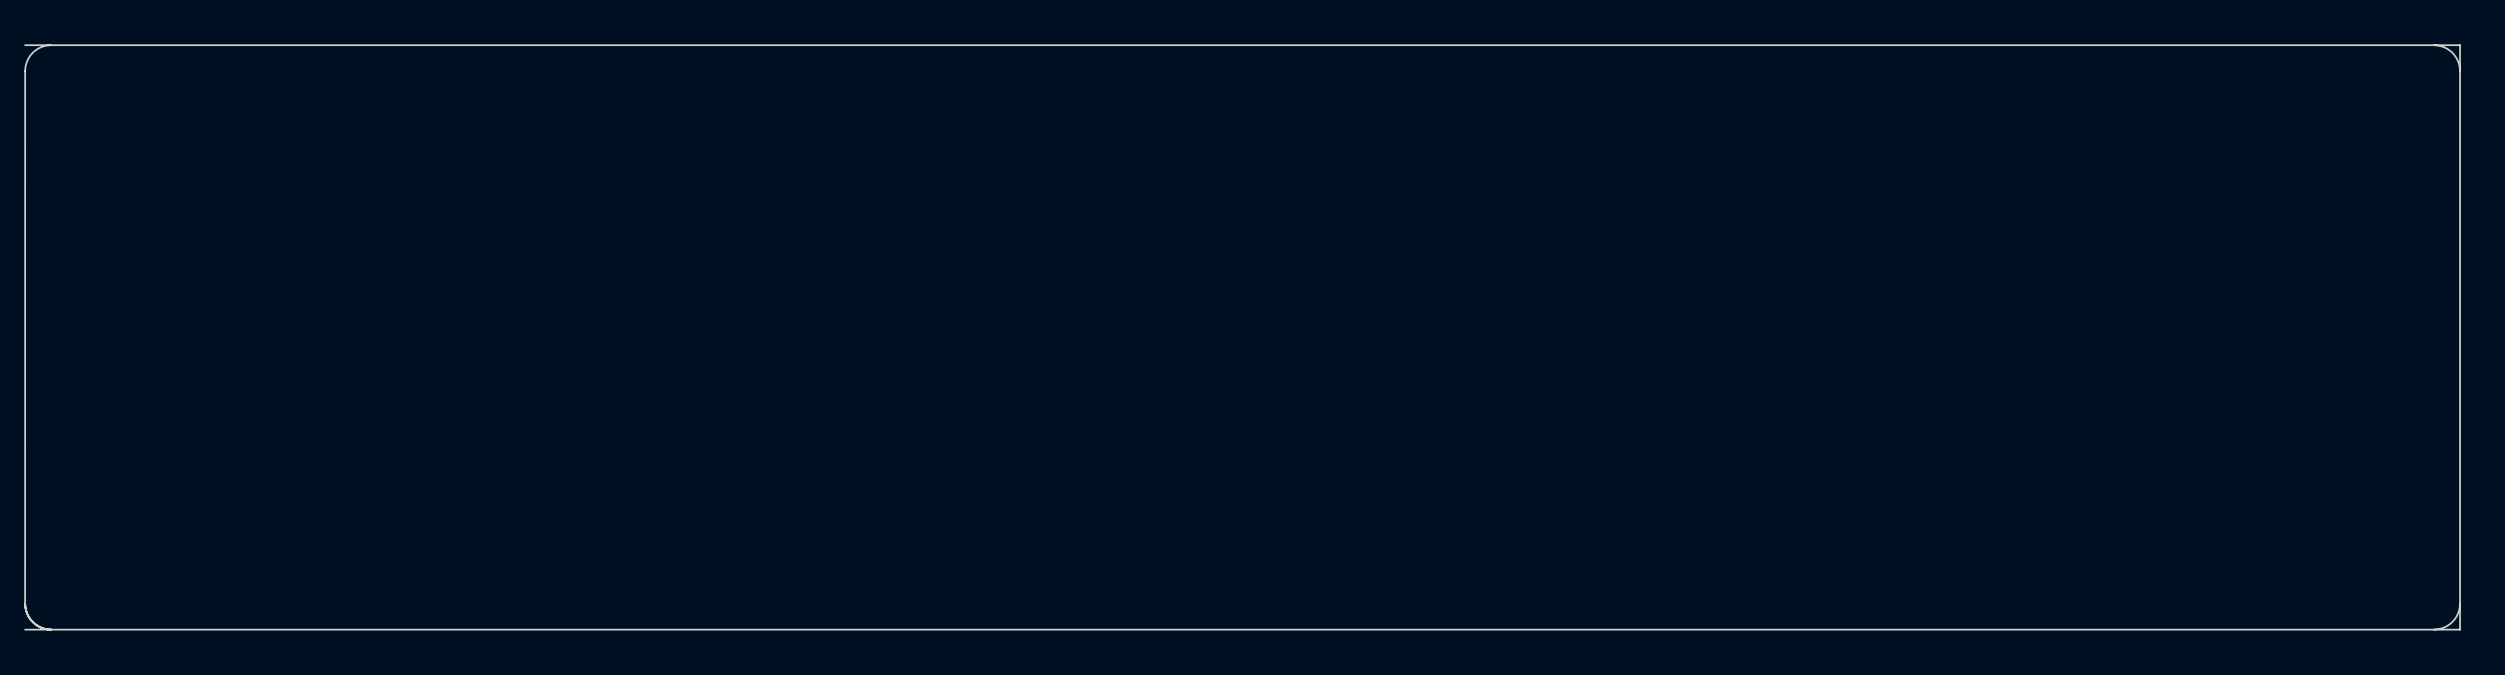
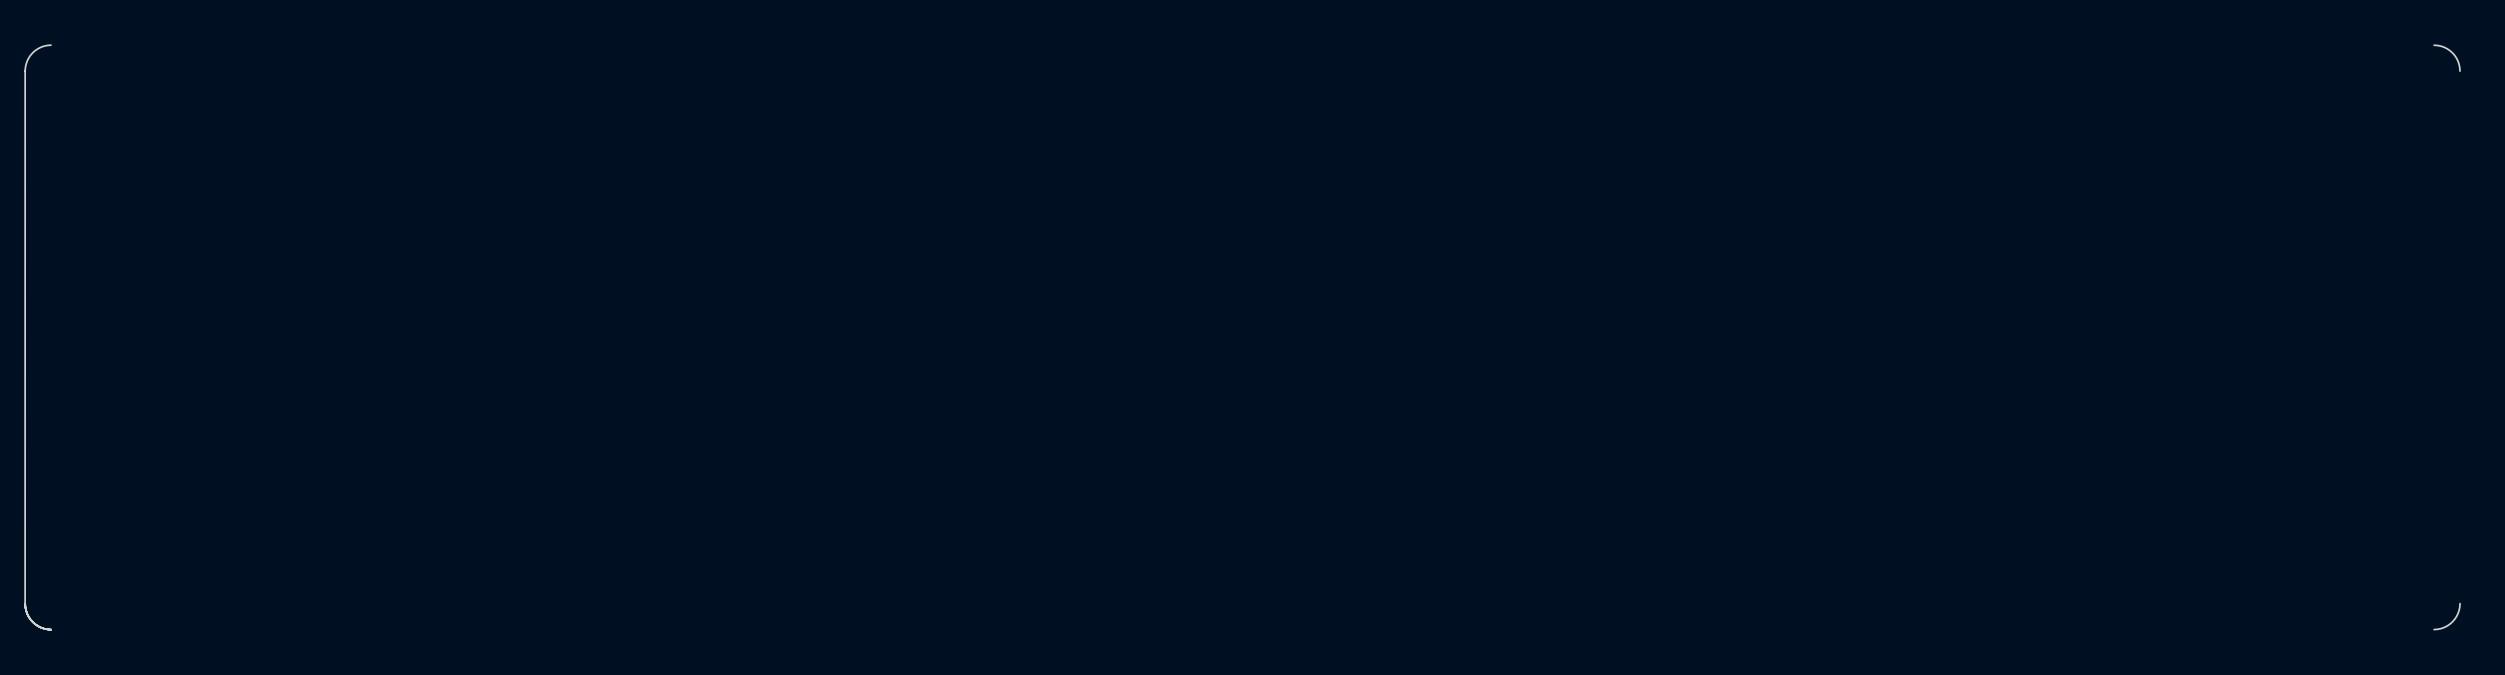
board edge: (25, 45) (2460, 45) (2460, 629) (25, 629) -> none

